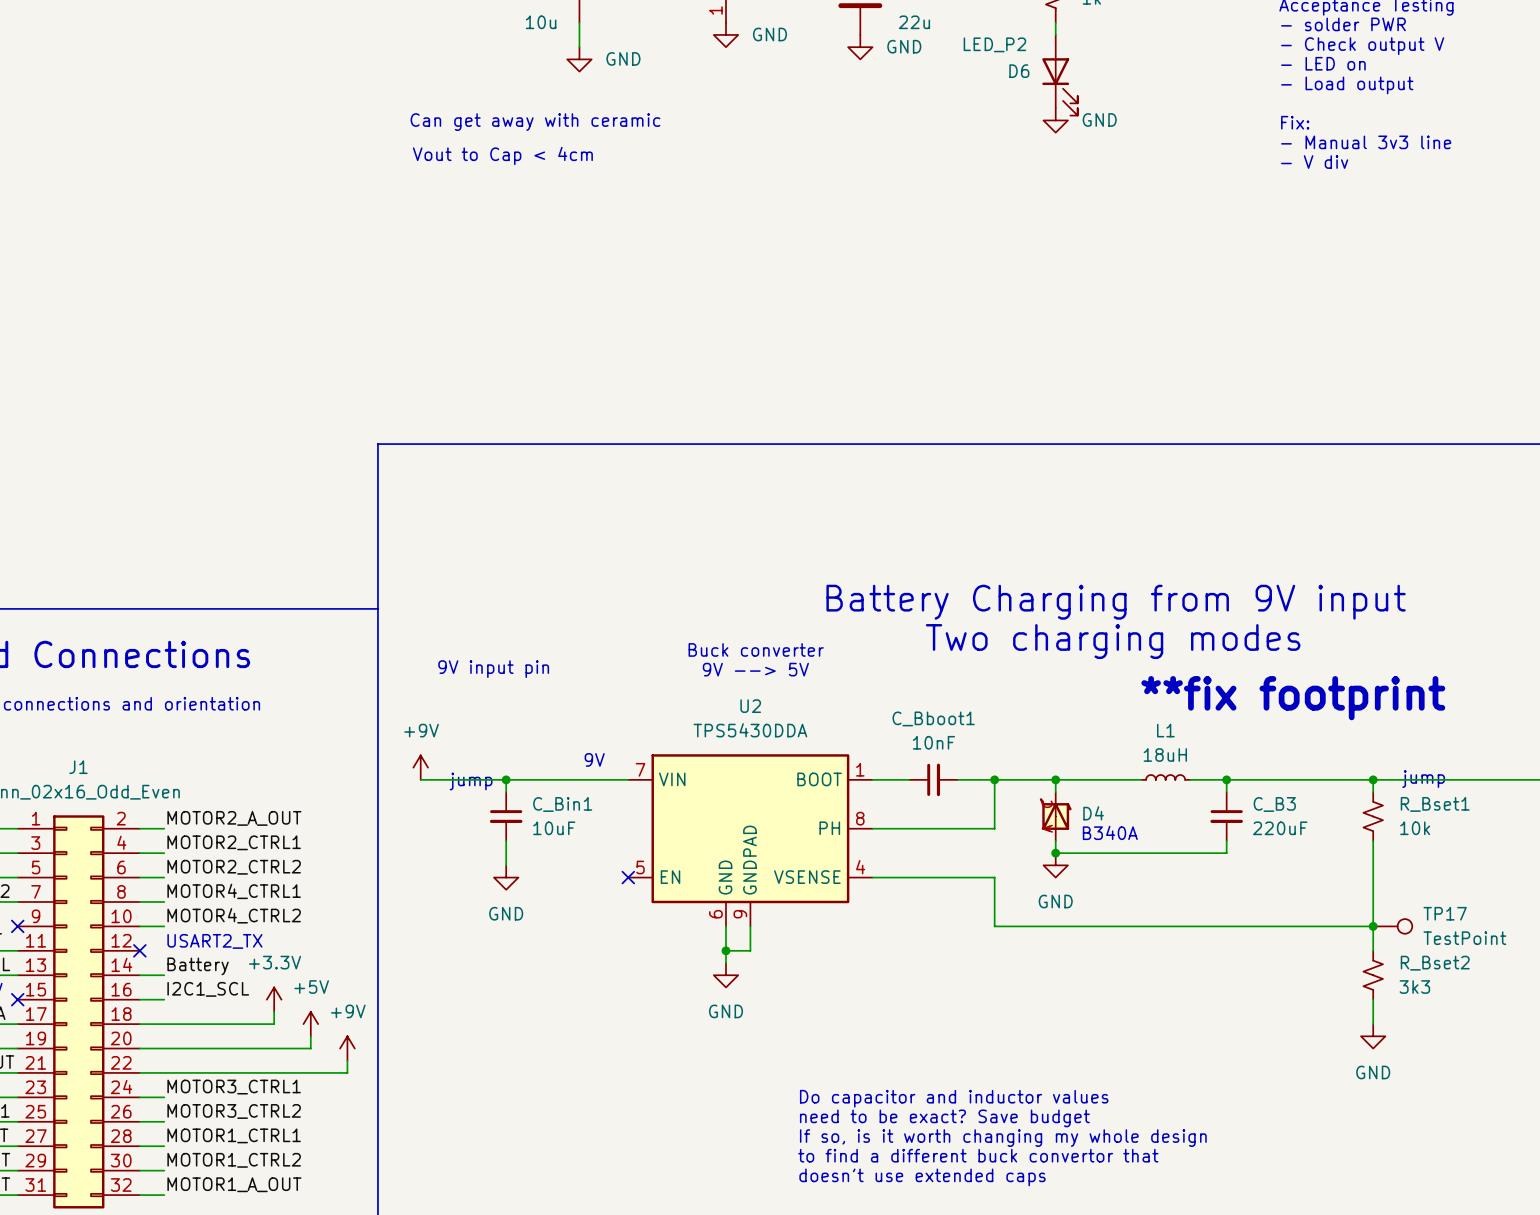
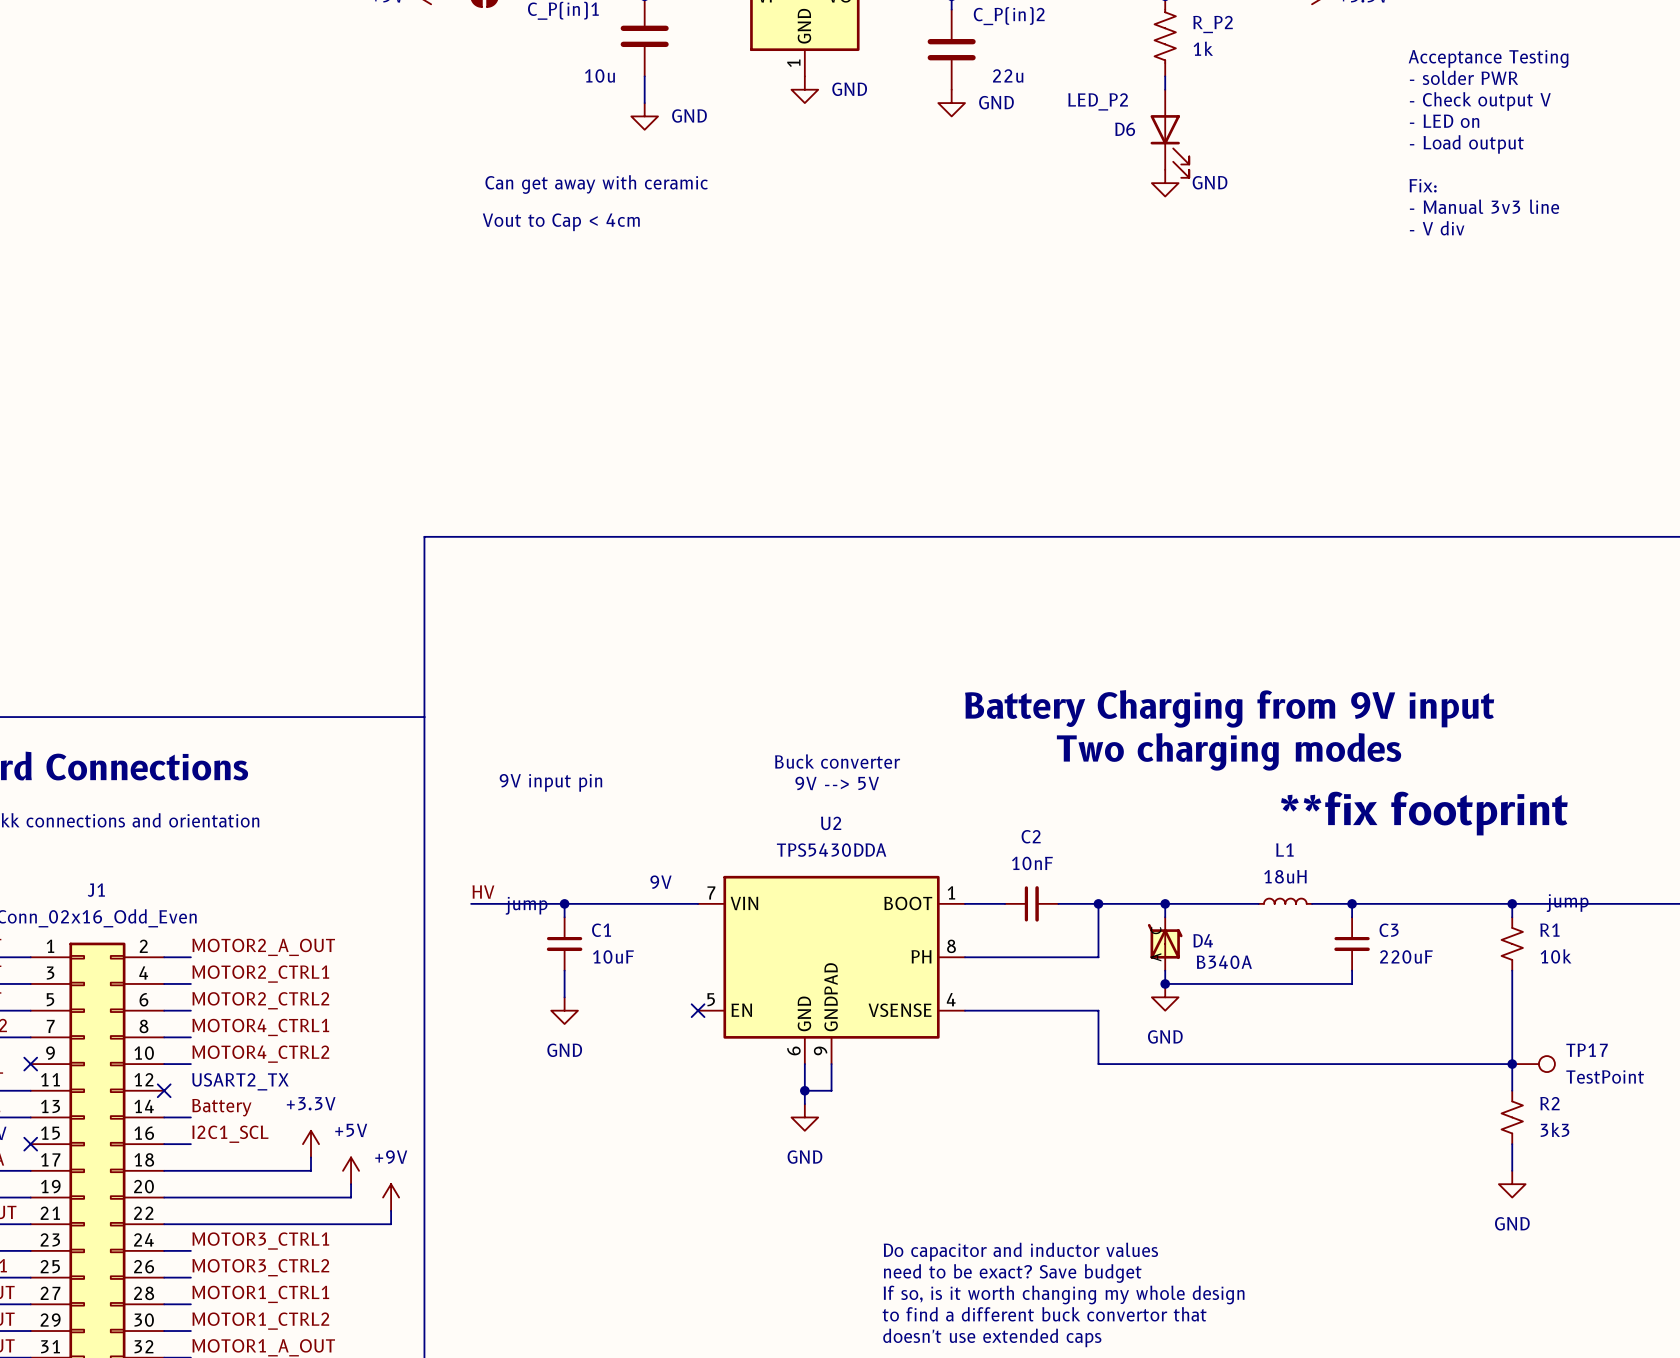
C_Bboot1 name: C_Bboot1 (933, 718) -> C2 (1031, 836)
power symbol: +9V (420, 767) -> none
label: none -> HV (483, 892)
C_Bin1 name: C_Bin1 (562, 804) -> C1 (601, 930)
C_B3 name: C_B3 (1274, 804) -> C3 (1389, 930)
R_Bset1 name: R_Bset1 (1435, 804) -> R1 (1549, 930)
R_Bset2 name: R_Bset2 (1435, 963) -> R2 (1549, 1103)

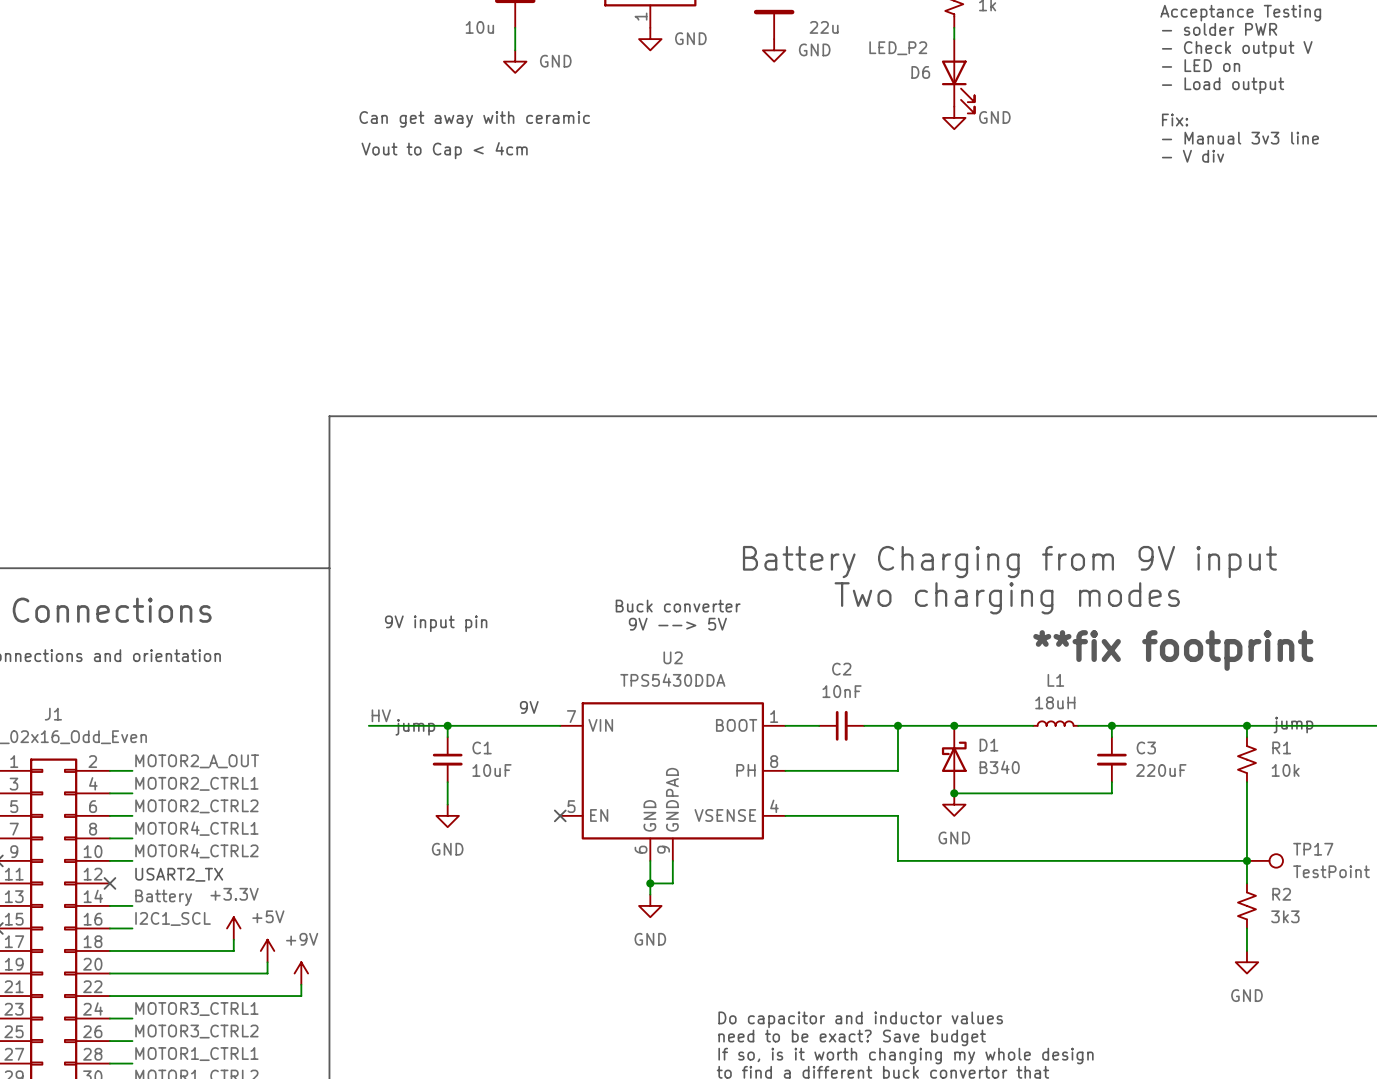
D4: (1165, 943) -> none
D1: none -> B340 (954, 759)
text: B340A (1224, 962) -> none

